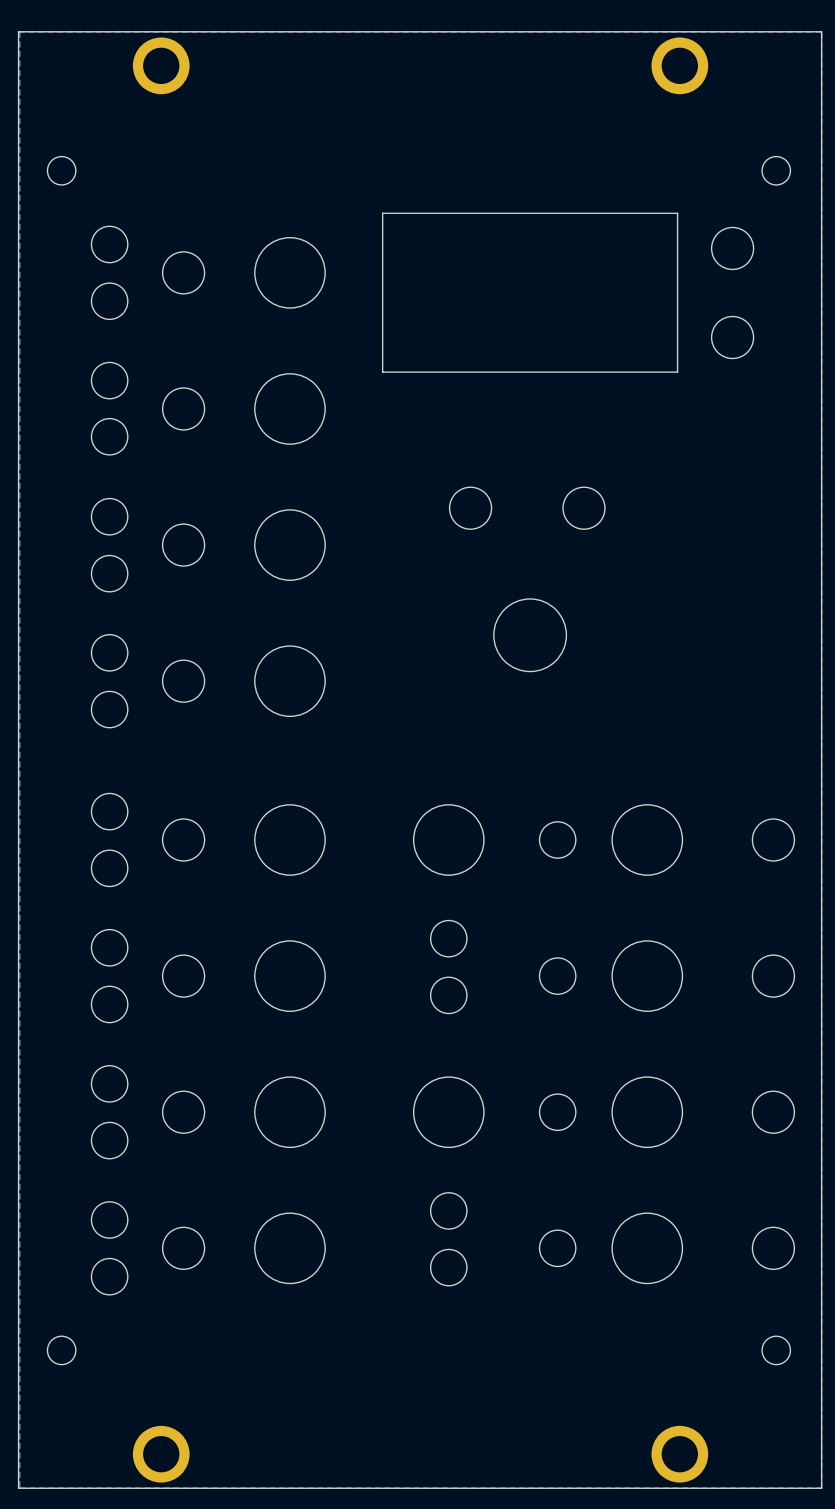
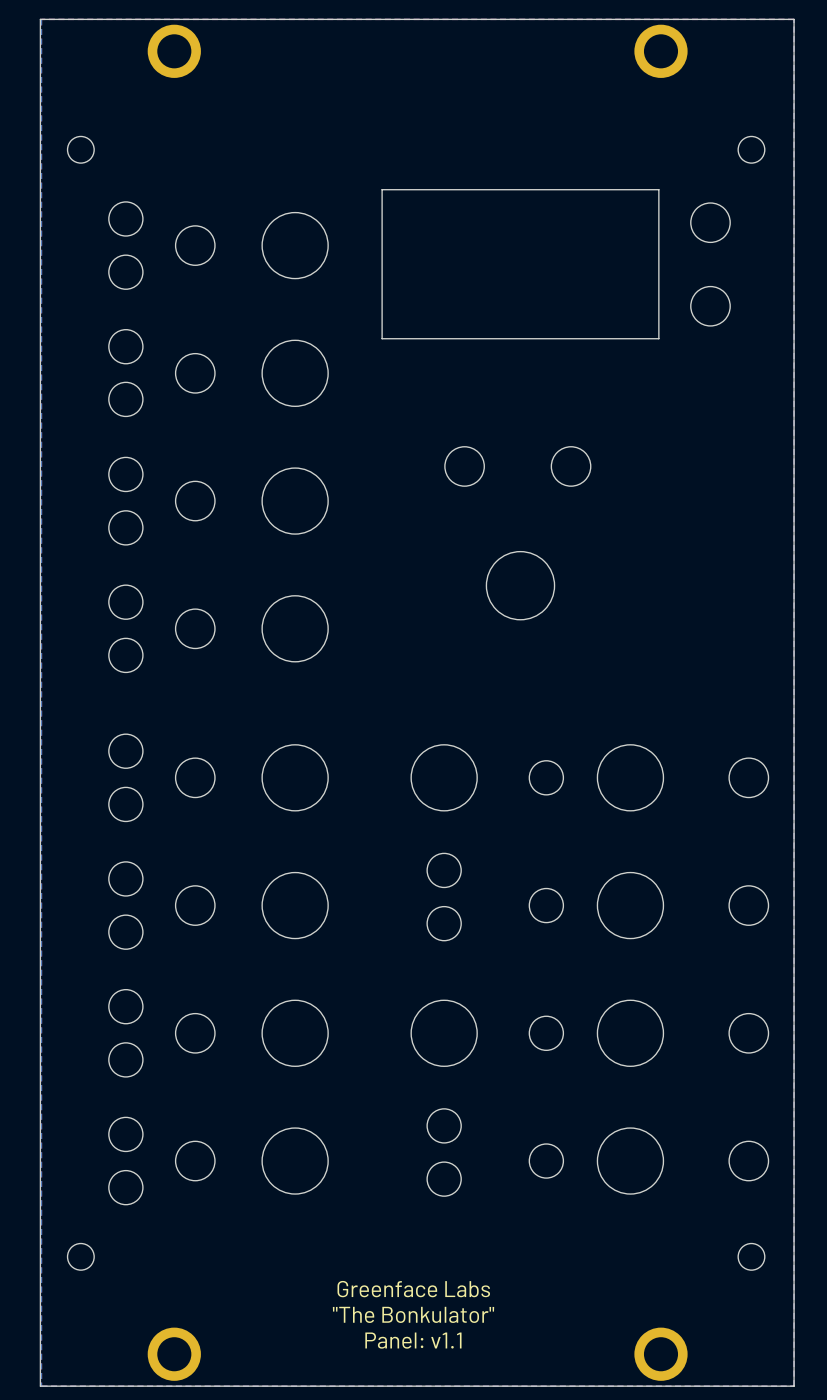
text: none -> Greenface Labs (413, 1289)
text: none -> "The Bonkulator" (413, 1314)
text: none -> Panel: v1.1 (413, 1340)

